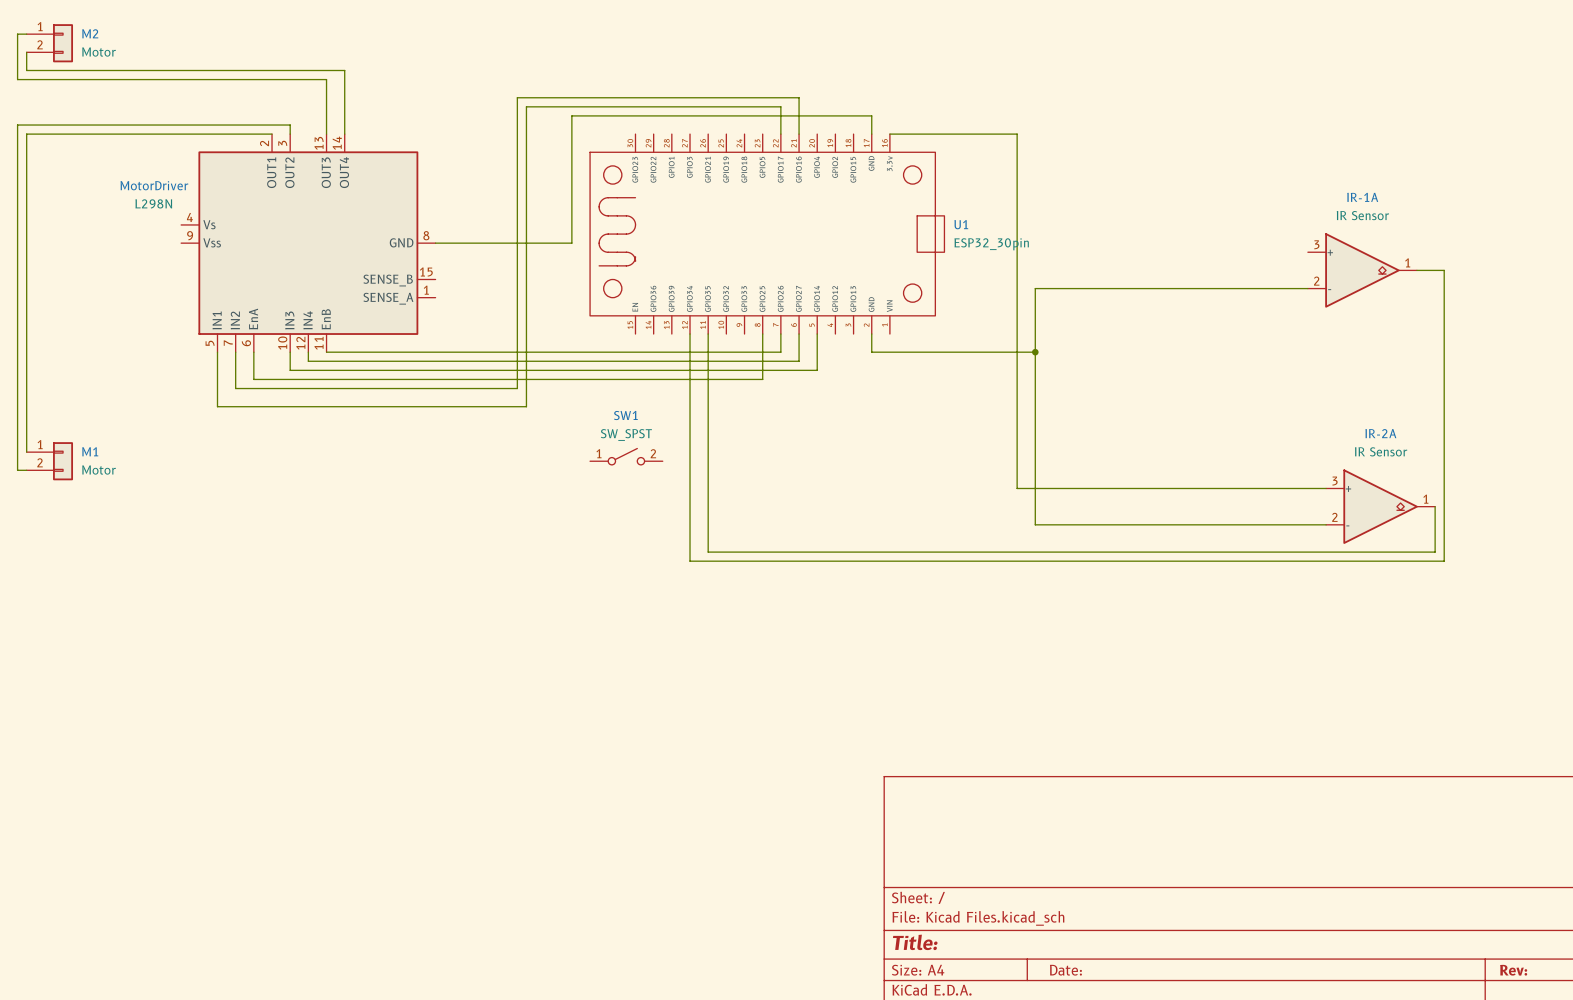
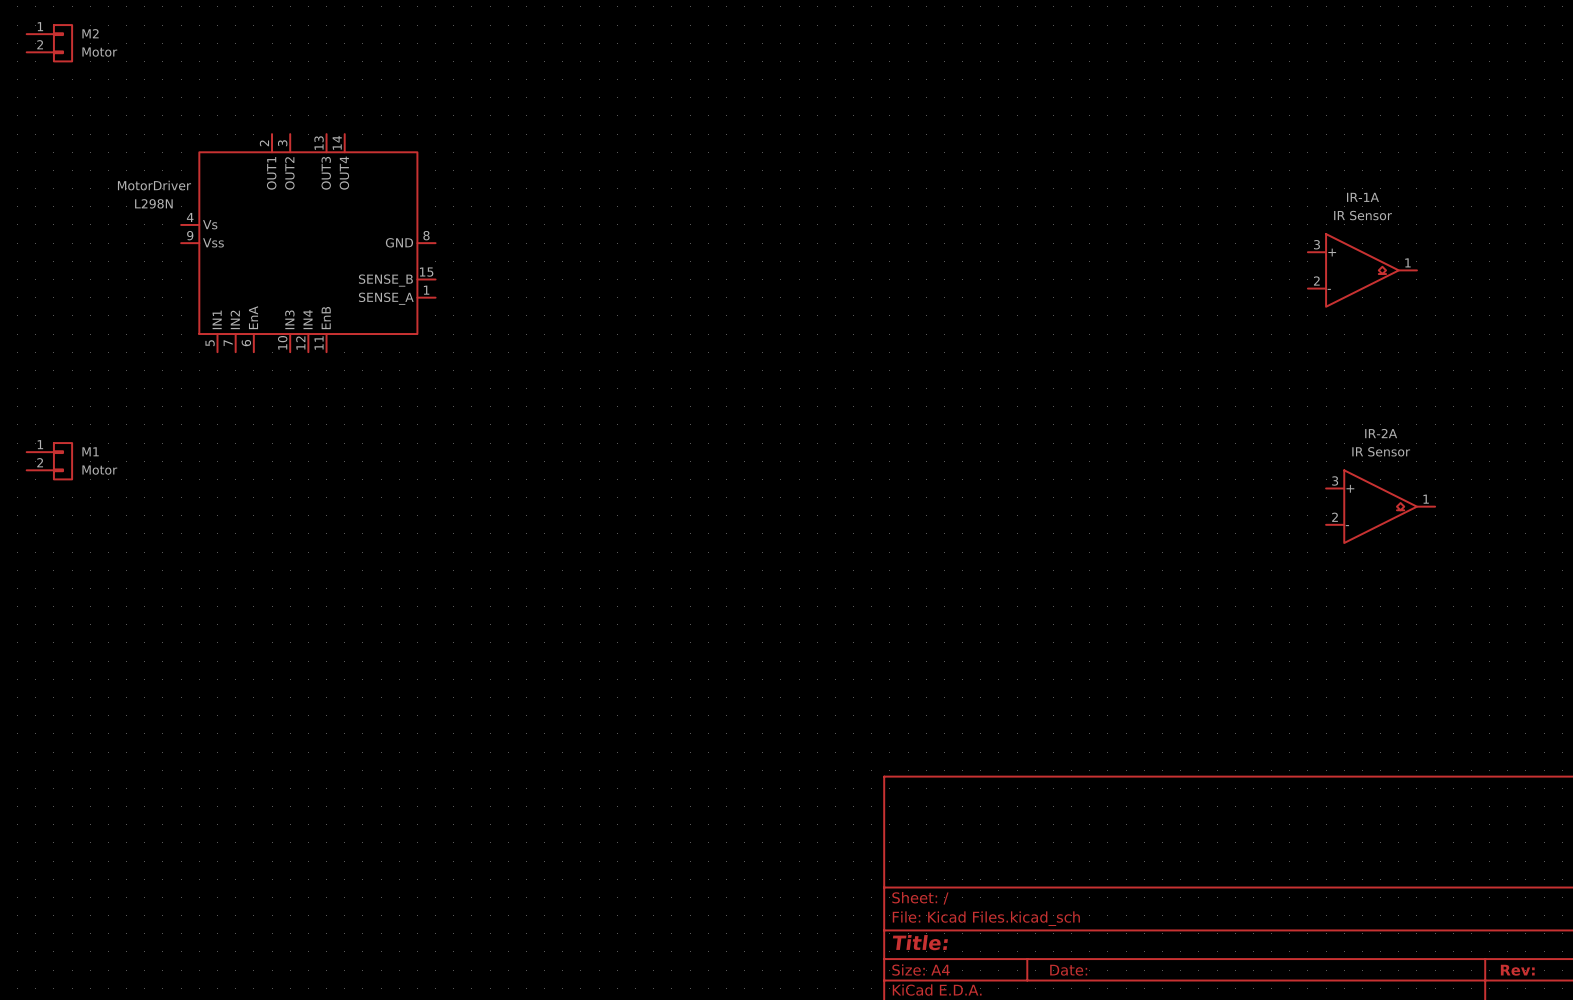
wire: (26, 34) (17, 34) (17, 79) (326, 79) (326, 134) -> none
wire: (26, 52) (26, 70) (344, 70) (344, 134) -> none
wire: (272, 134) (26, 134) (26, 452) -> none
wire: (290, 134) (290, 125) (17, 125) (17, 470) (26, 470) -> none
wire: (780, 134) (780, 106) (526, 106) (526, 406) (217, 406) (217, 352) -> none
wire: (799, 134) (799, 97) (517, 97) (517, 388) (235, 388) (235, 352) -> none
wire: (871, 134) (871, 115) (571, 115) (571, 243) (435, 243) -> none
wire: (889, 134) (1017, 134) (1017, 488) (1326, 488) -> none
U1: (767, 234) -> none
wire: (1416, 270) (1444, 270) (1444, 561) (690, 561) (690, 334) -> none
wire: (1307, 288) (1035, 288) (1035, 524) (1326, 524) -> none
wire: (708, 334) (708, 552) (1435, 552) (1435, 506) -> none
wire: (762, 334) (762, 379) (253, 379) (253, 352) -> none
wire: (780, 334) (780, 352) (326, 352) -> none
wire: (799, 334) (799, 361) (308, 361) (308, 352) -> none
wire: (817, 334) (817, 370) (290, 370) (290, 352) -> none
wire: (871, 334) (871, 352) (1035, 352) -> none
junction: (1035, 352) -> none
SW1: SW_SPST (626, 456) -> none

